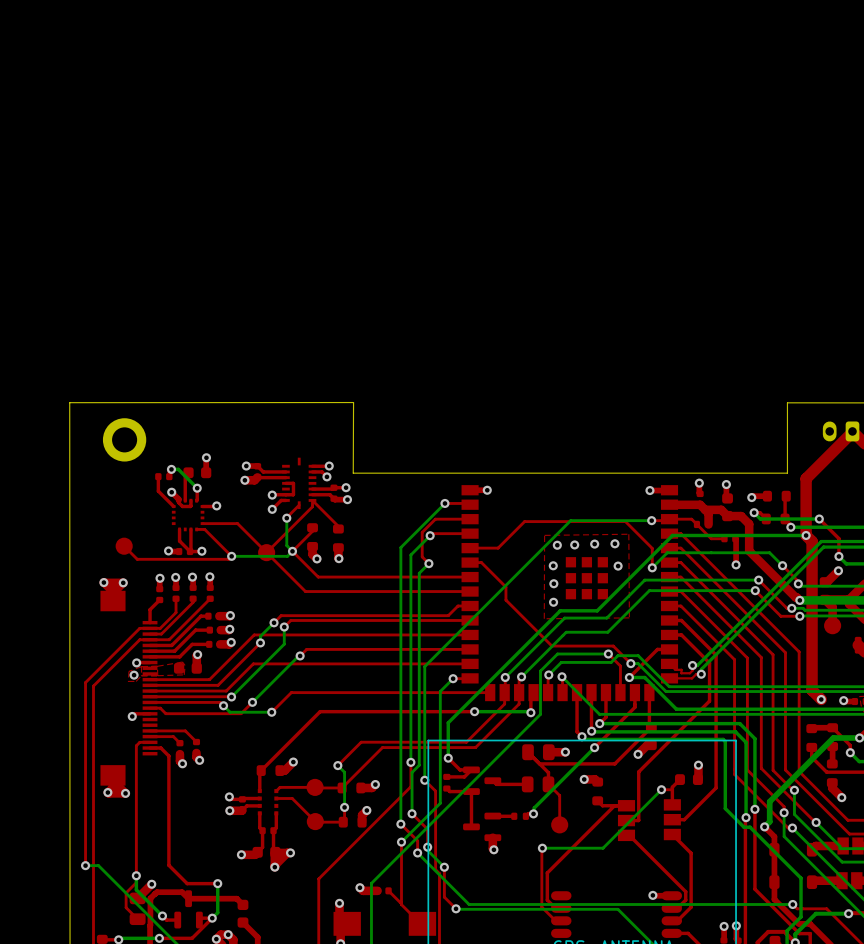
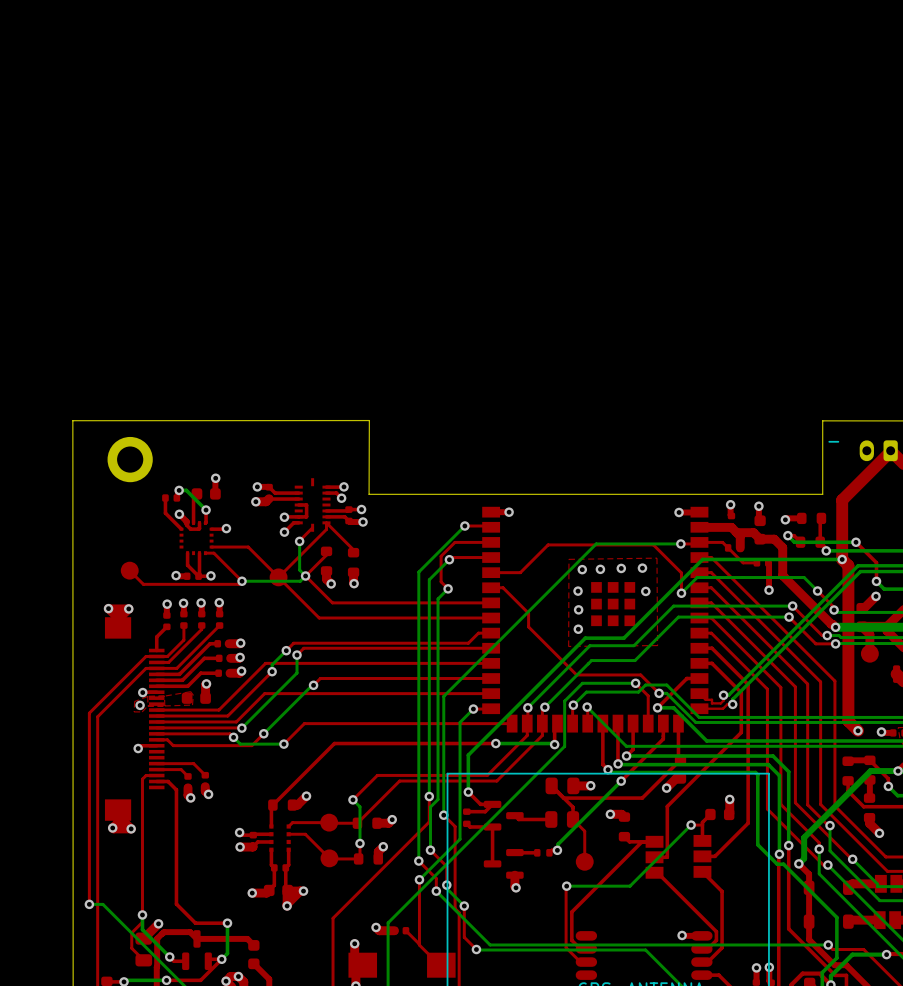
text: none -> - (833, 441)

